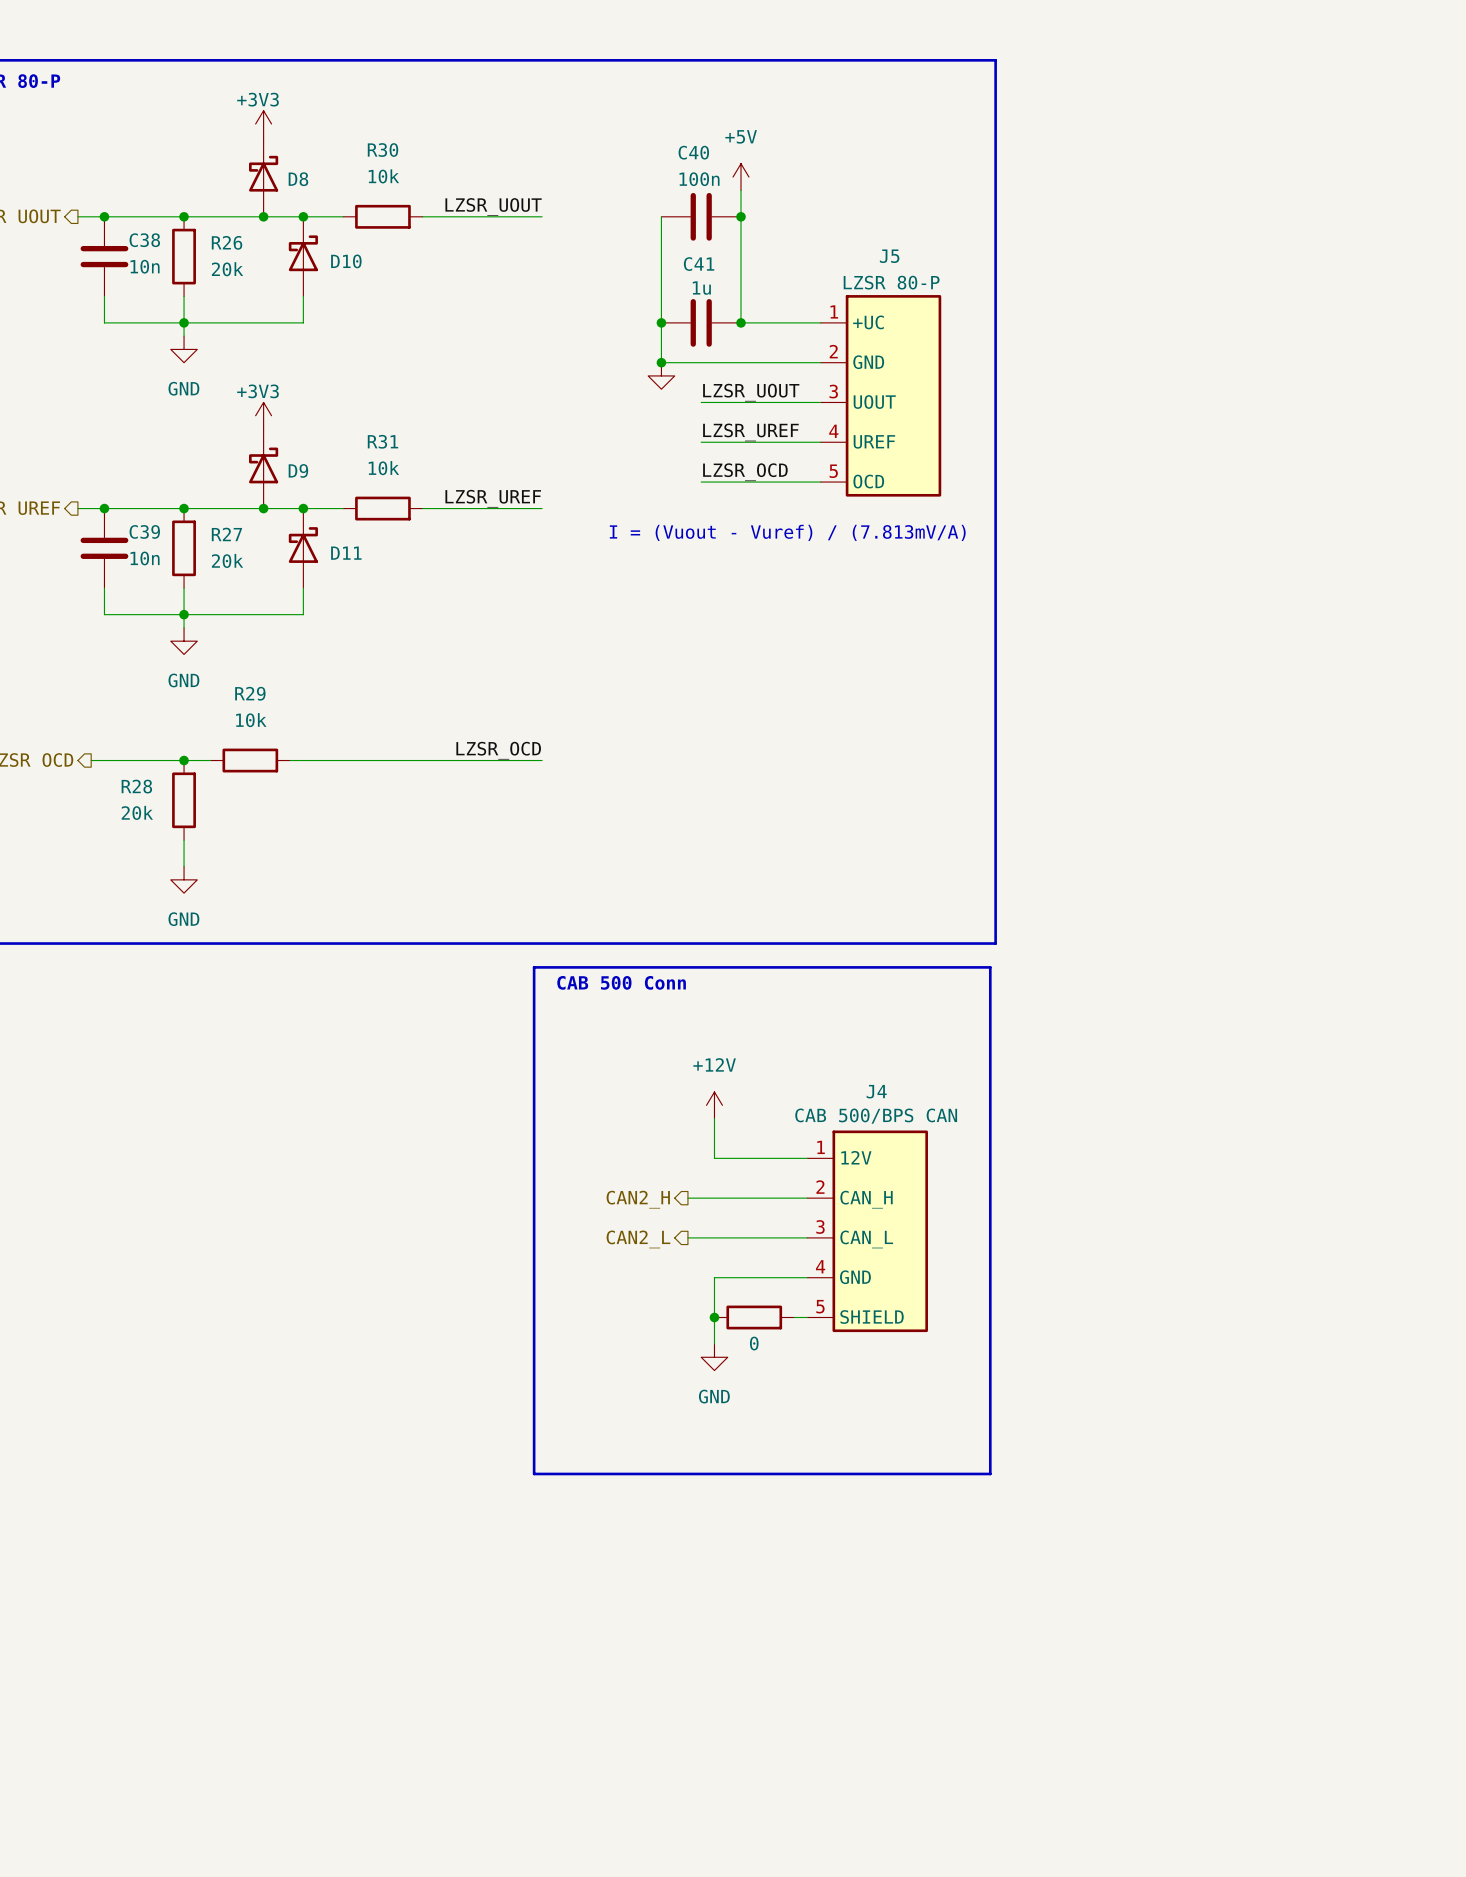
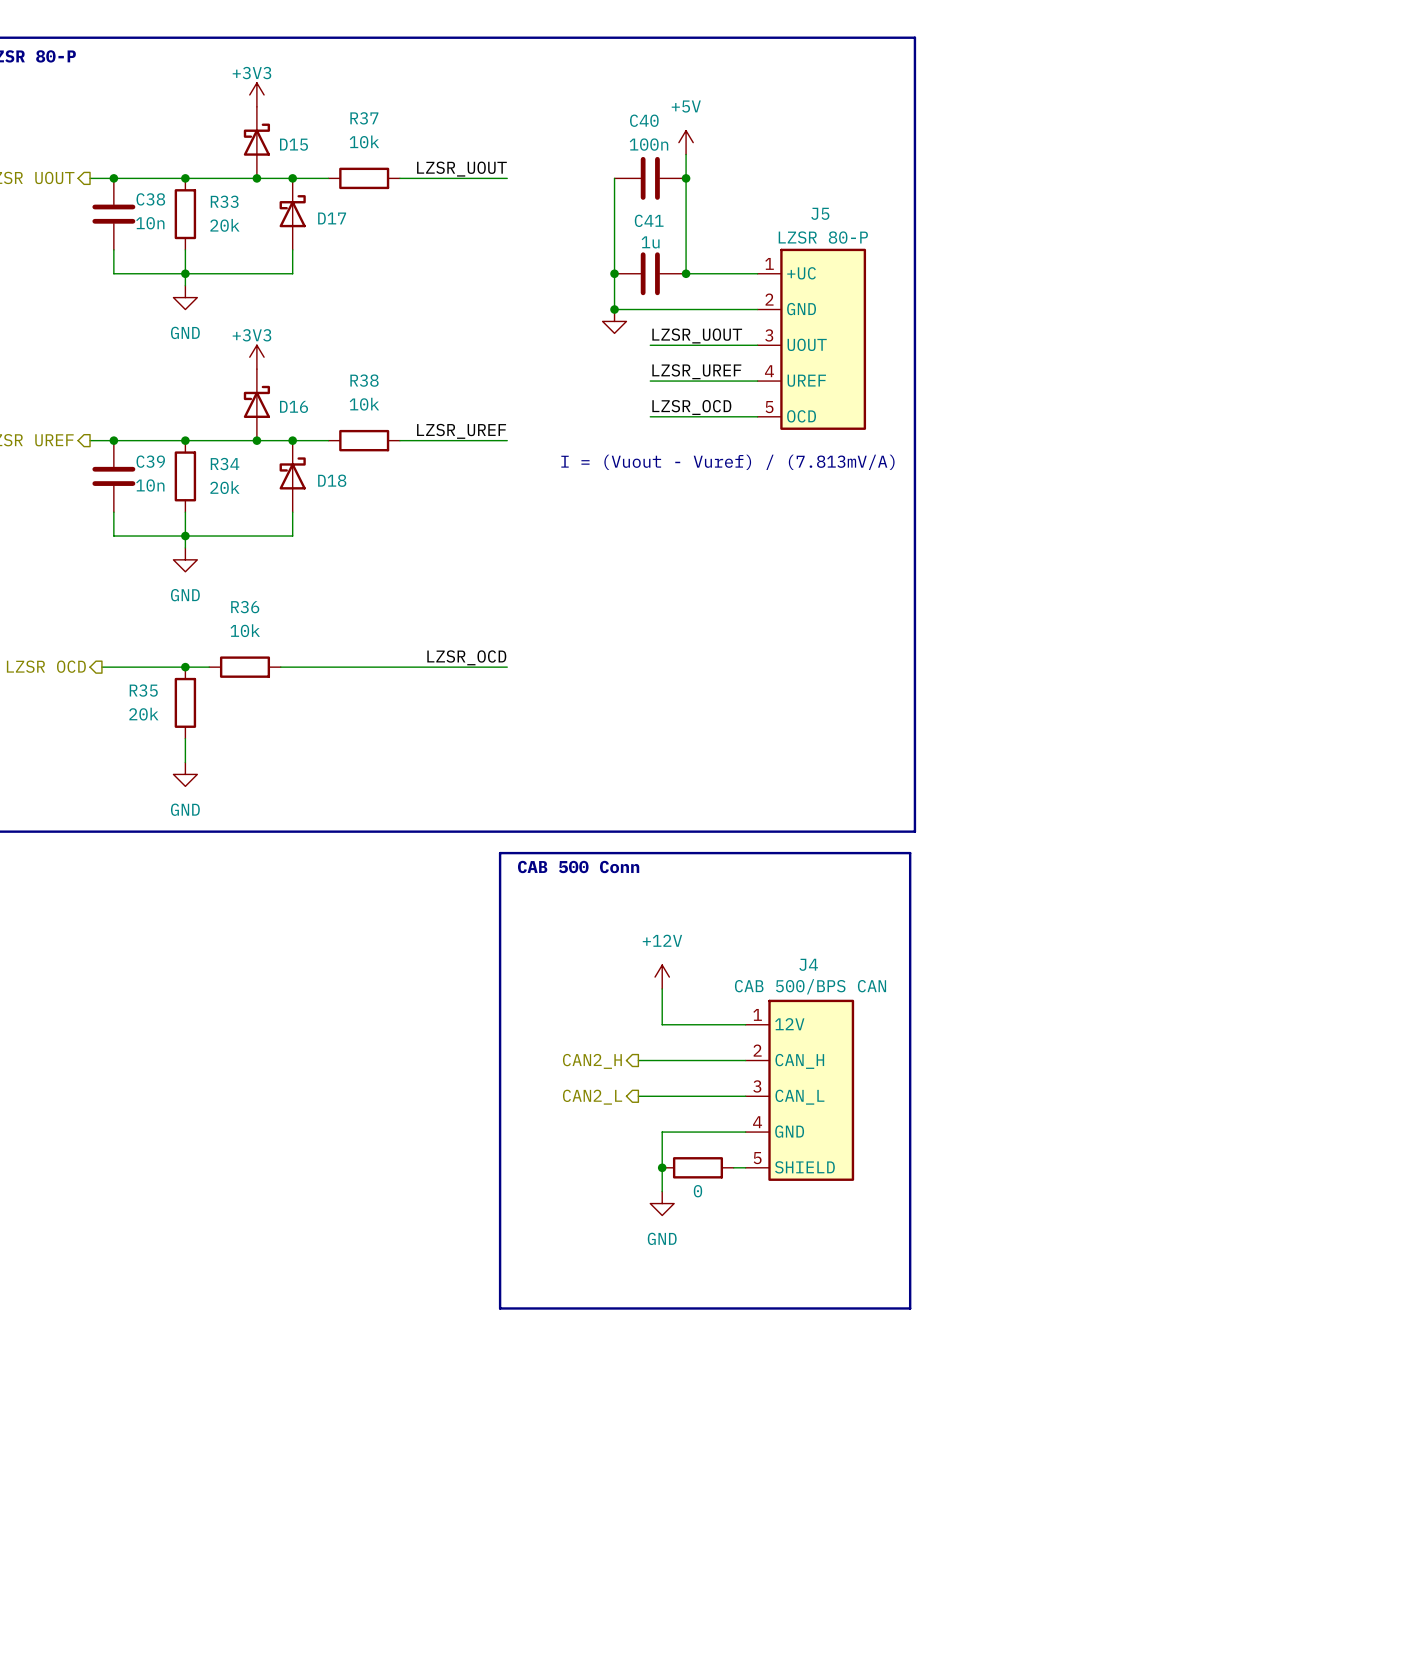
R30 name: R30 (382, 150) -> R37 (364, 118)
D8 name: D8 (298, 179) -> D15 (293, 144)
R26 name: R26 (227, 242) -> R33 (224, 201)
D10 name: D10 (346, 261) -> D17 (332, 218)
R31 name: R31 (382, 441) -> R38 (364, 380)
D9 name: D9 (298, 470) -> D16 (294, 406)
R27 name: R27 (226, 534) -> R34 (225, 464)
D11 name: D11 (346, 553) -> D18 (332, 480)
R29 name: R29 (250, 693) -> R36 (245, 607)
R28 name: R28 (136, 786) -> R35 (143, 690)

